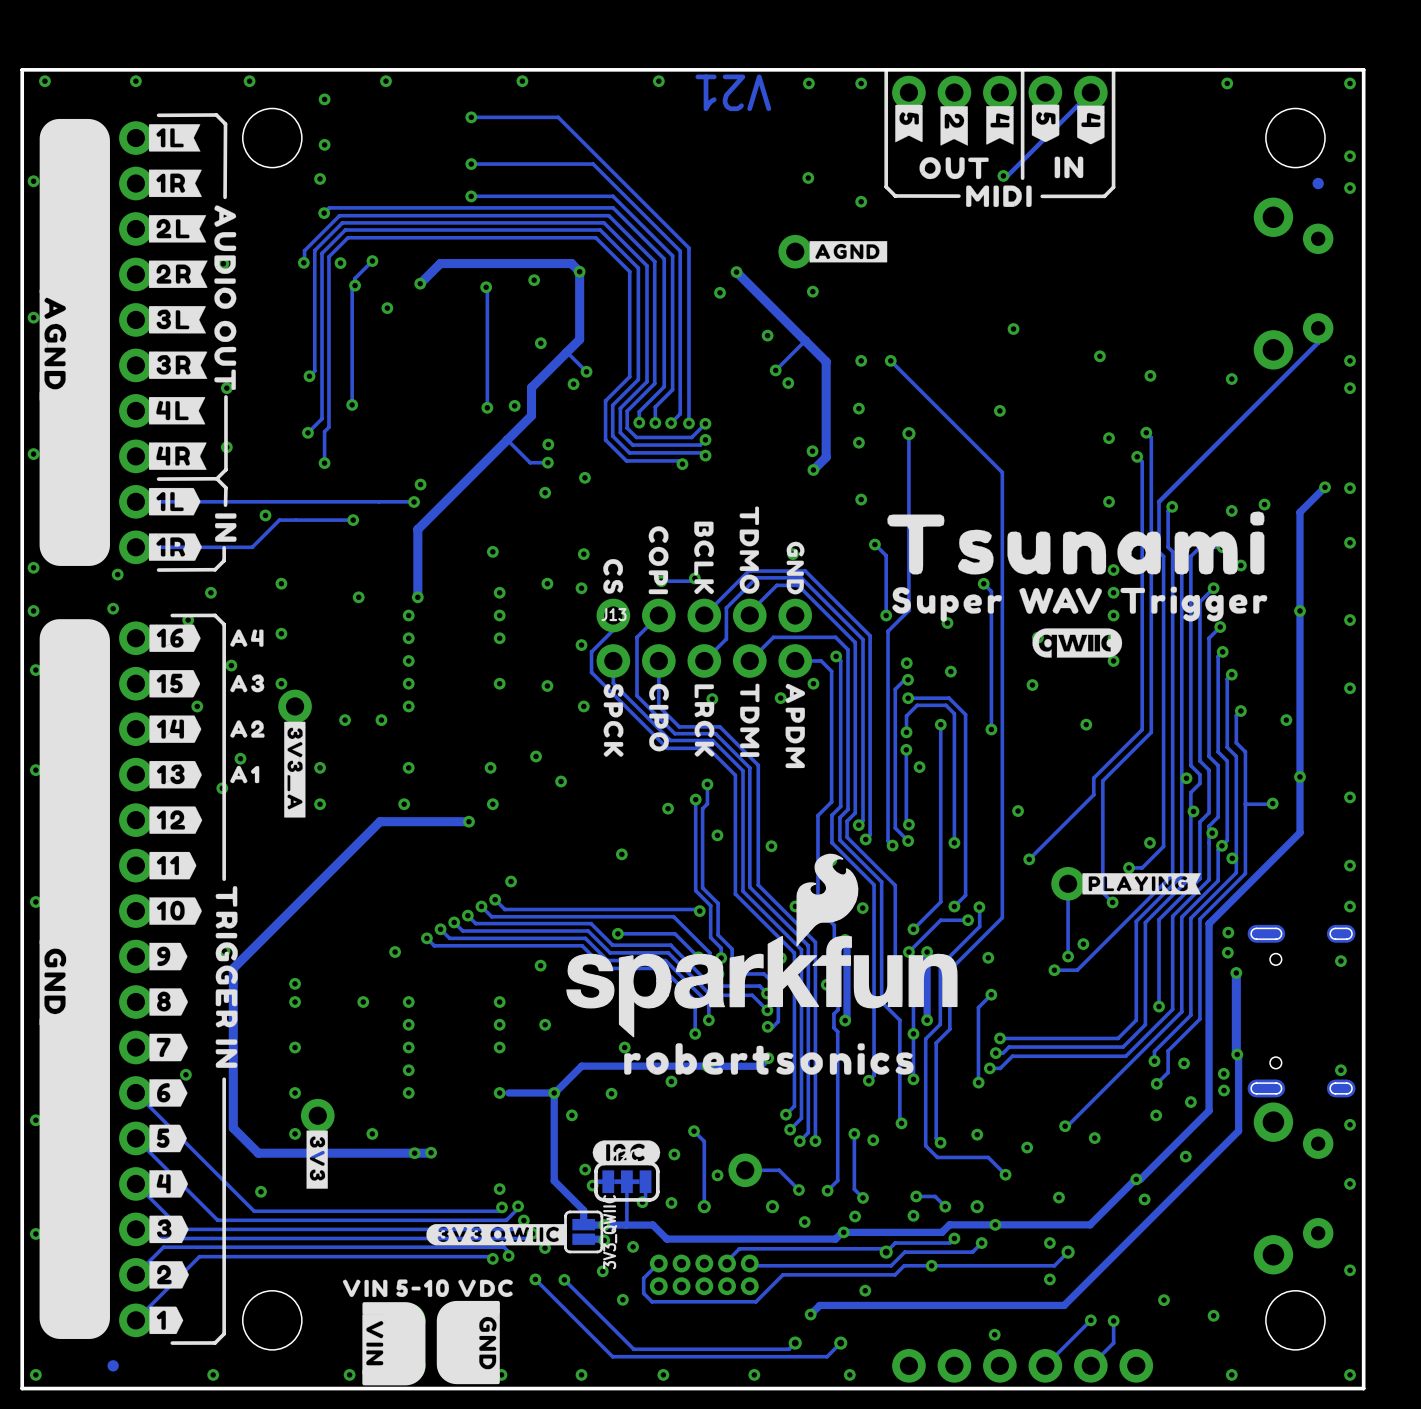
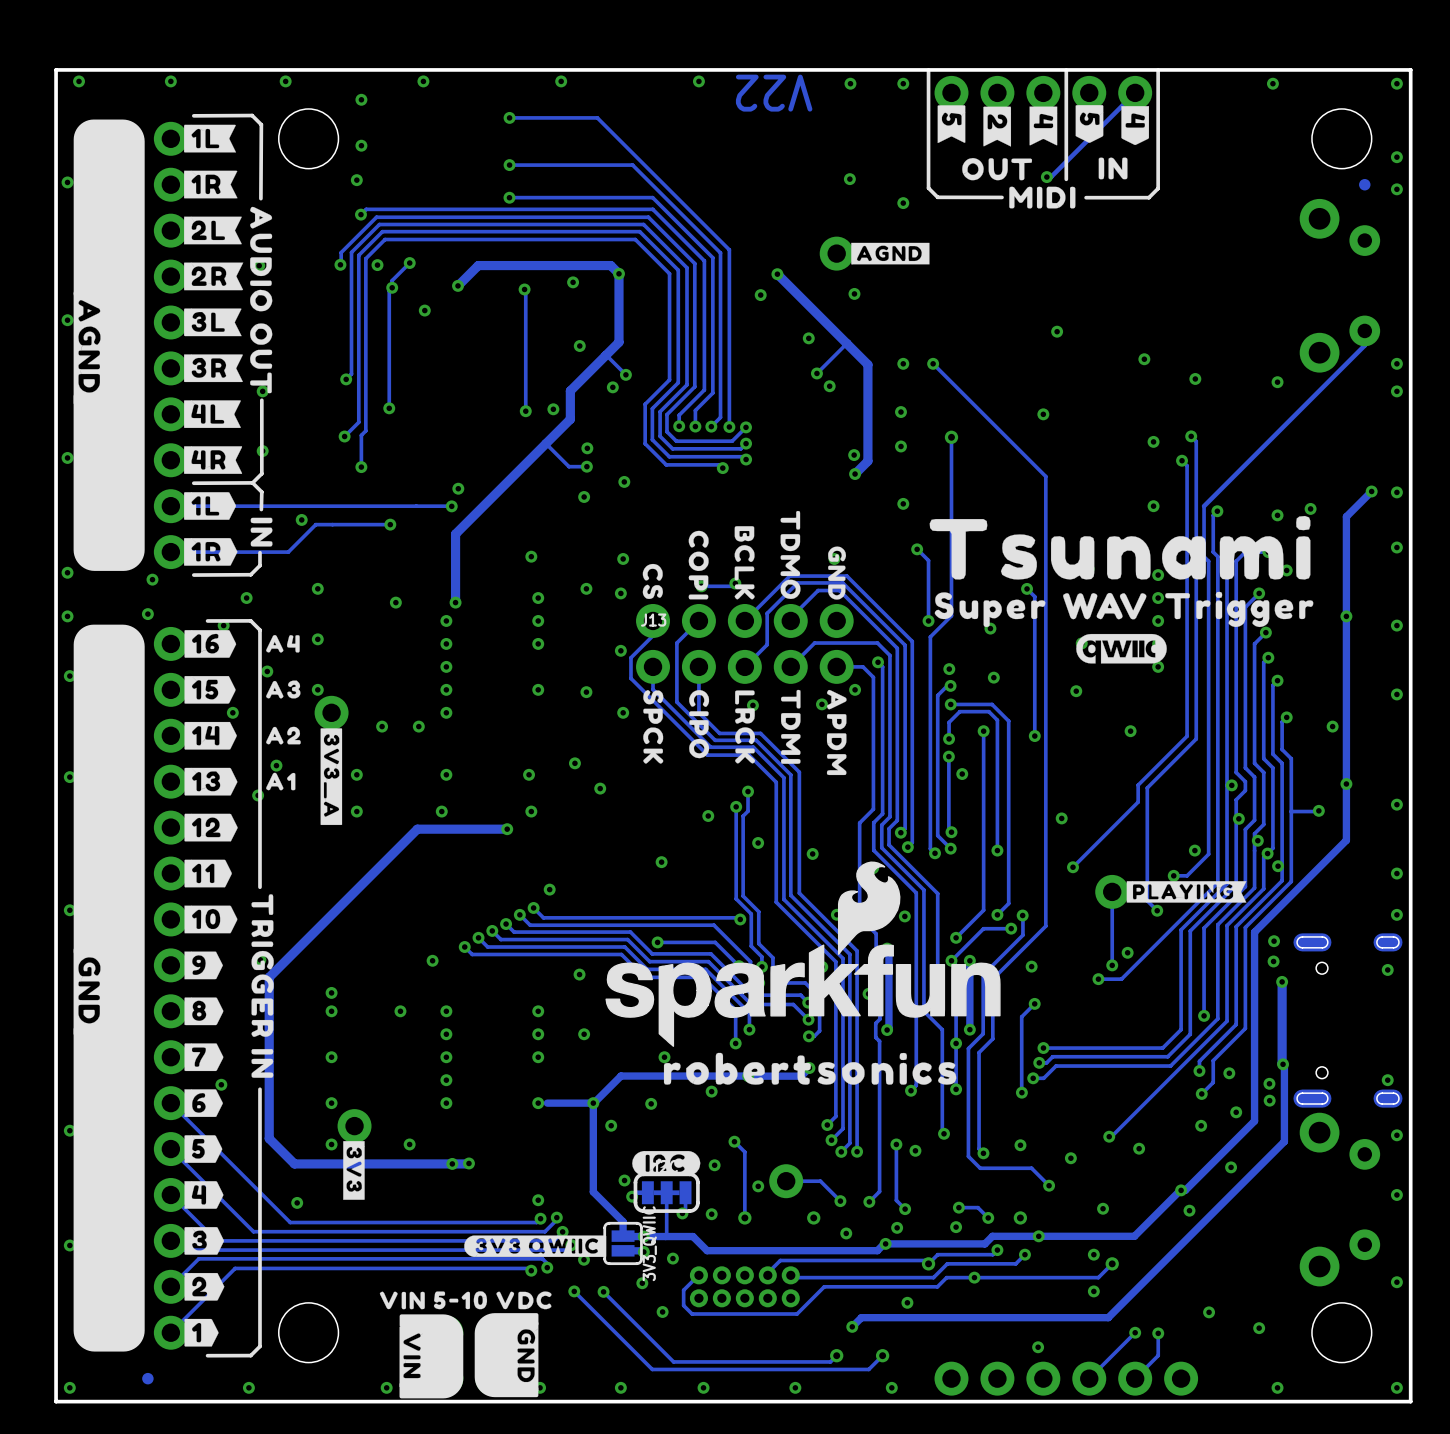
text: V21 (733, 92) -> V22 (774, 93)

